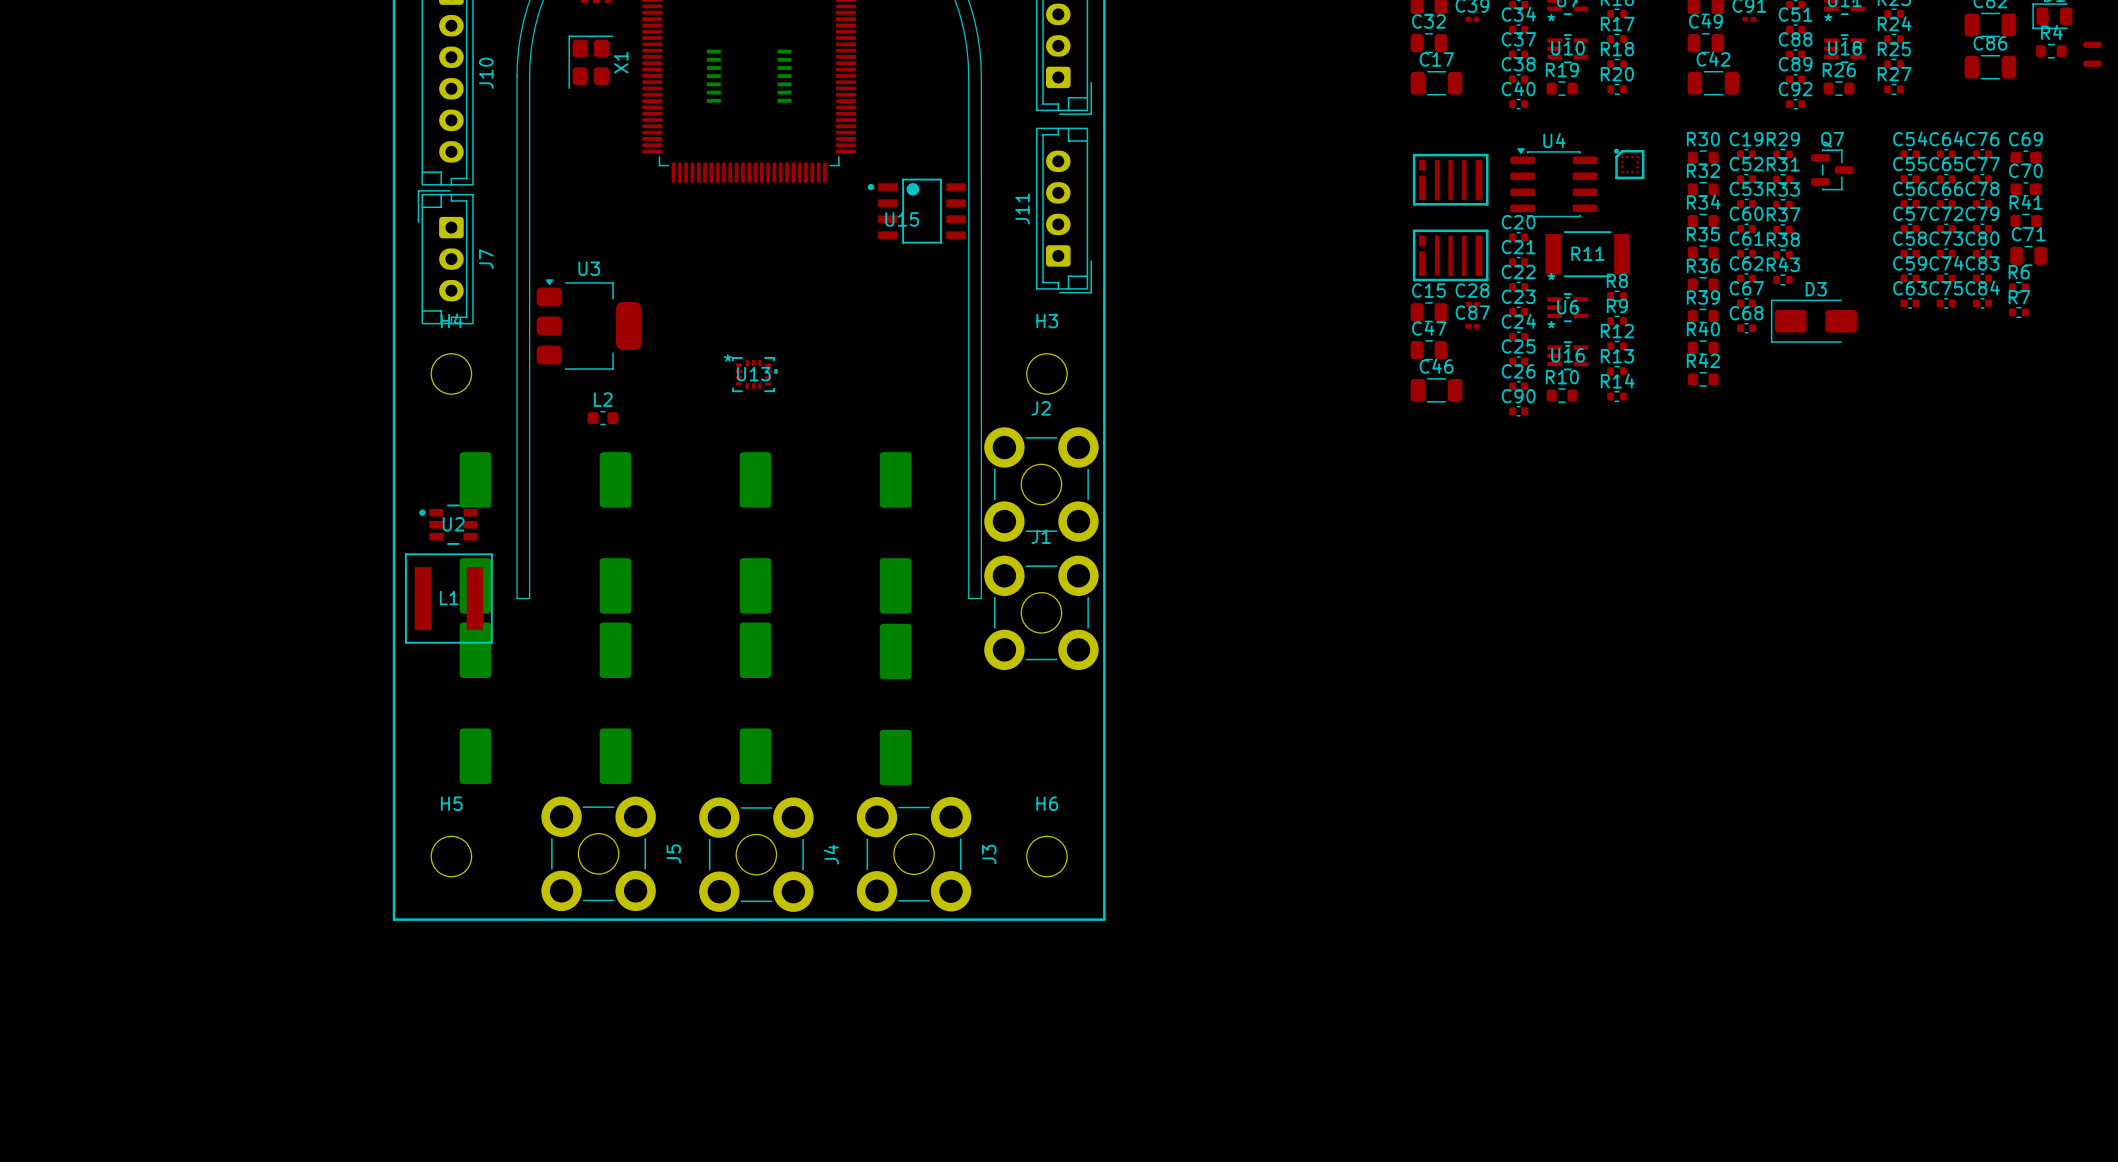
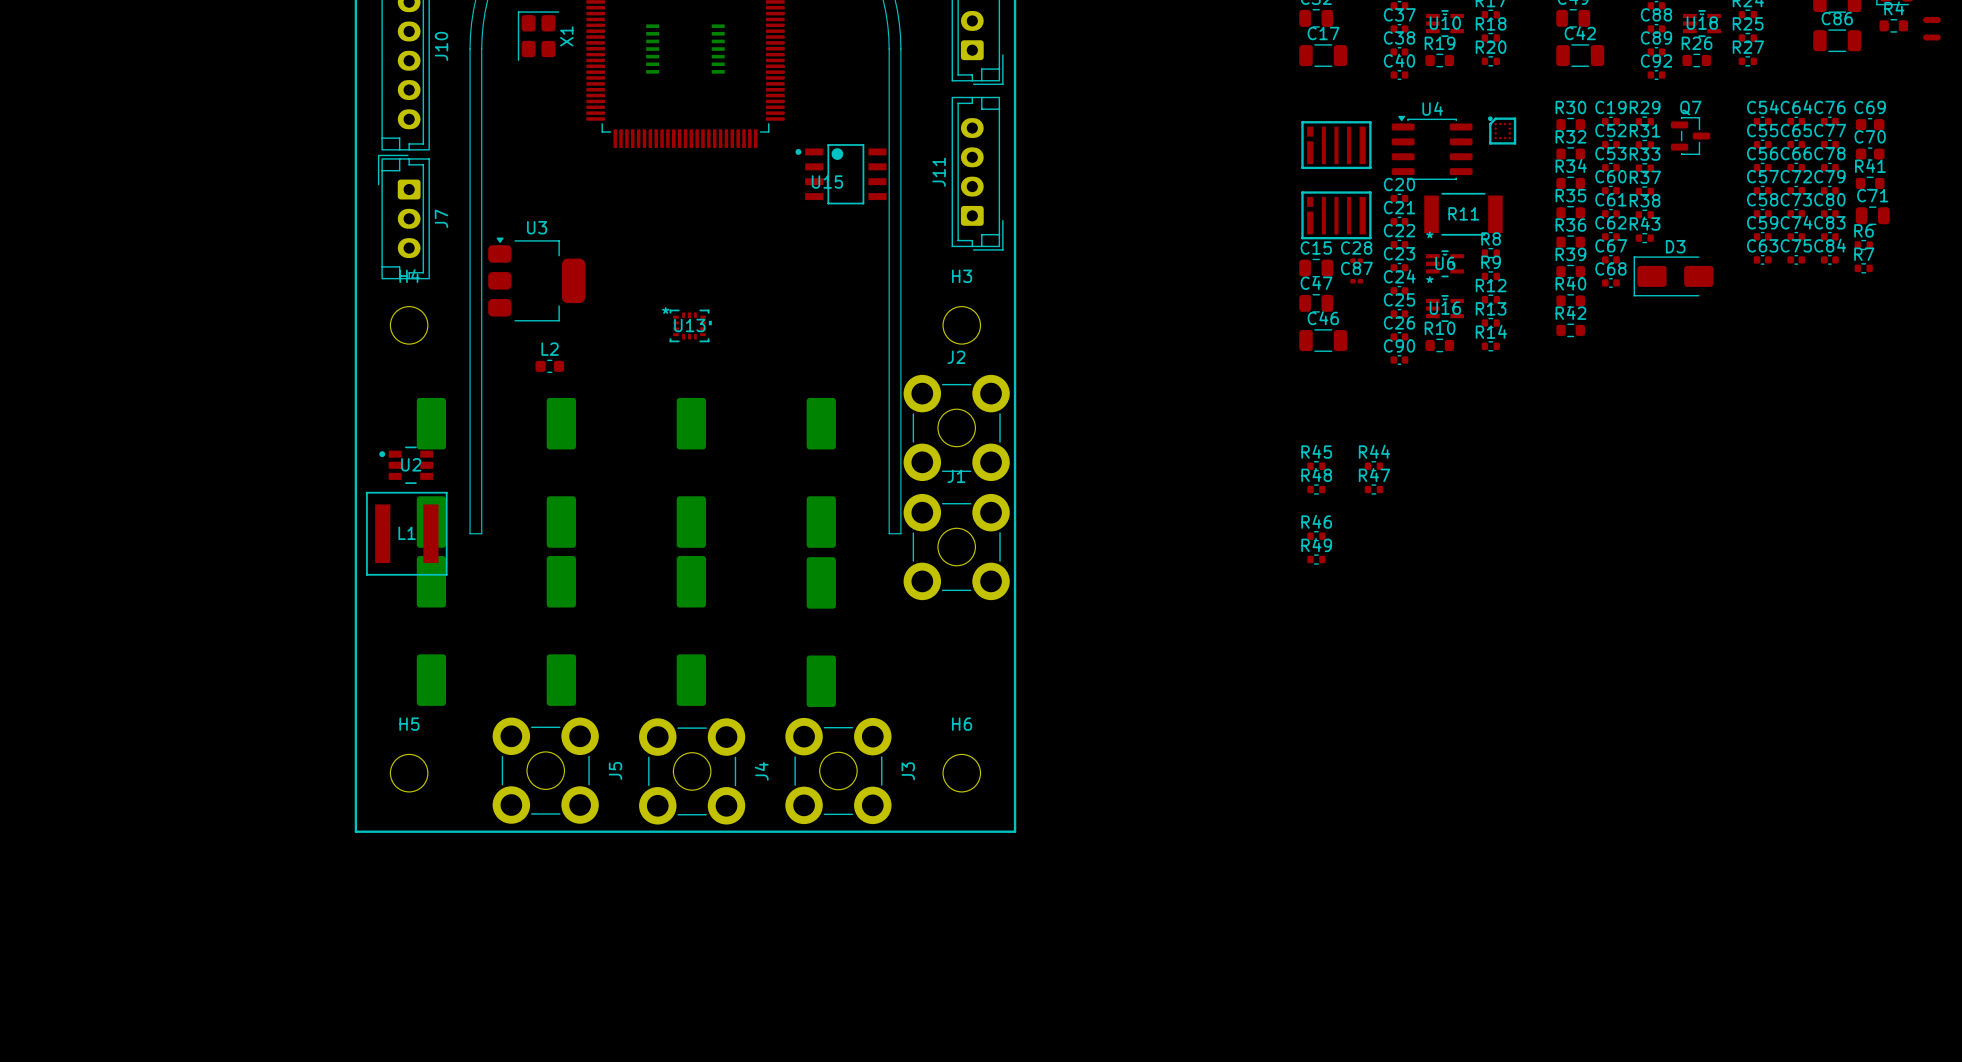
R45: none -> (1316, 466)
R44: none -> (1373, 466)
R48: none -> (1316, 489)
R47: none -> (1373, 489)
R46: none -> (1316, 536)
R49: none -> (1316, 559)

